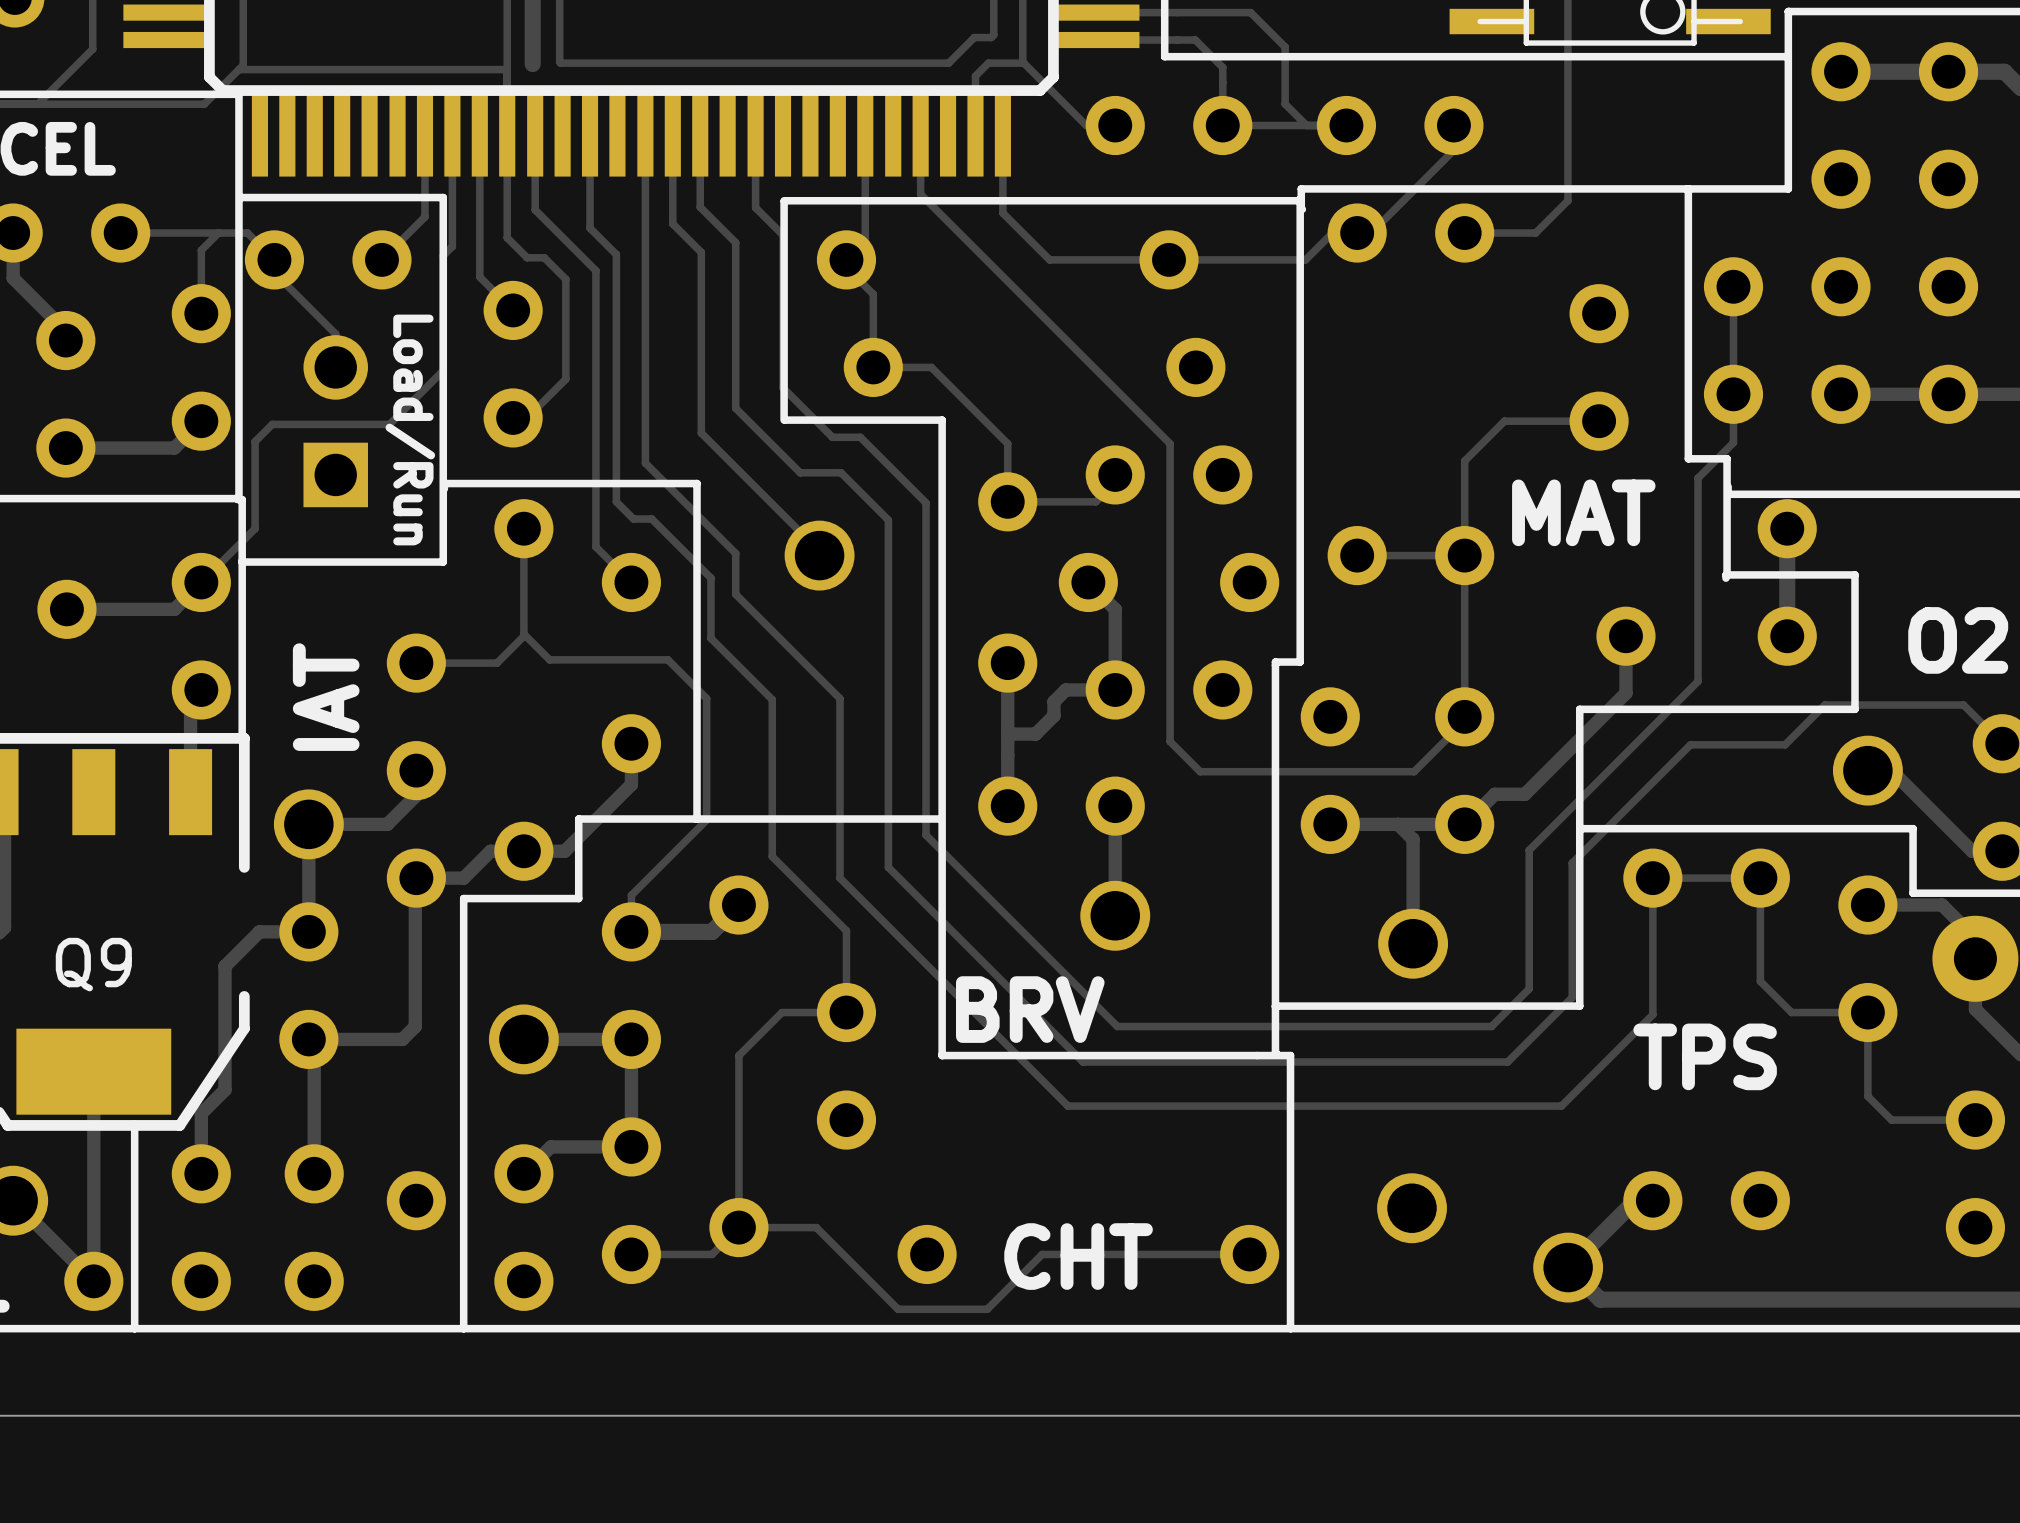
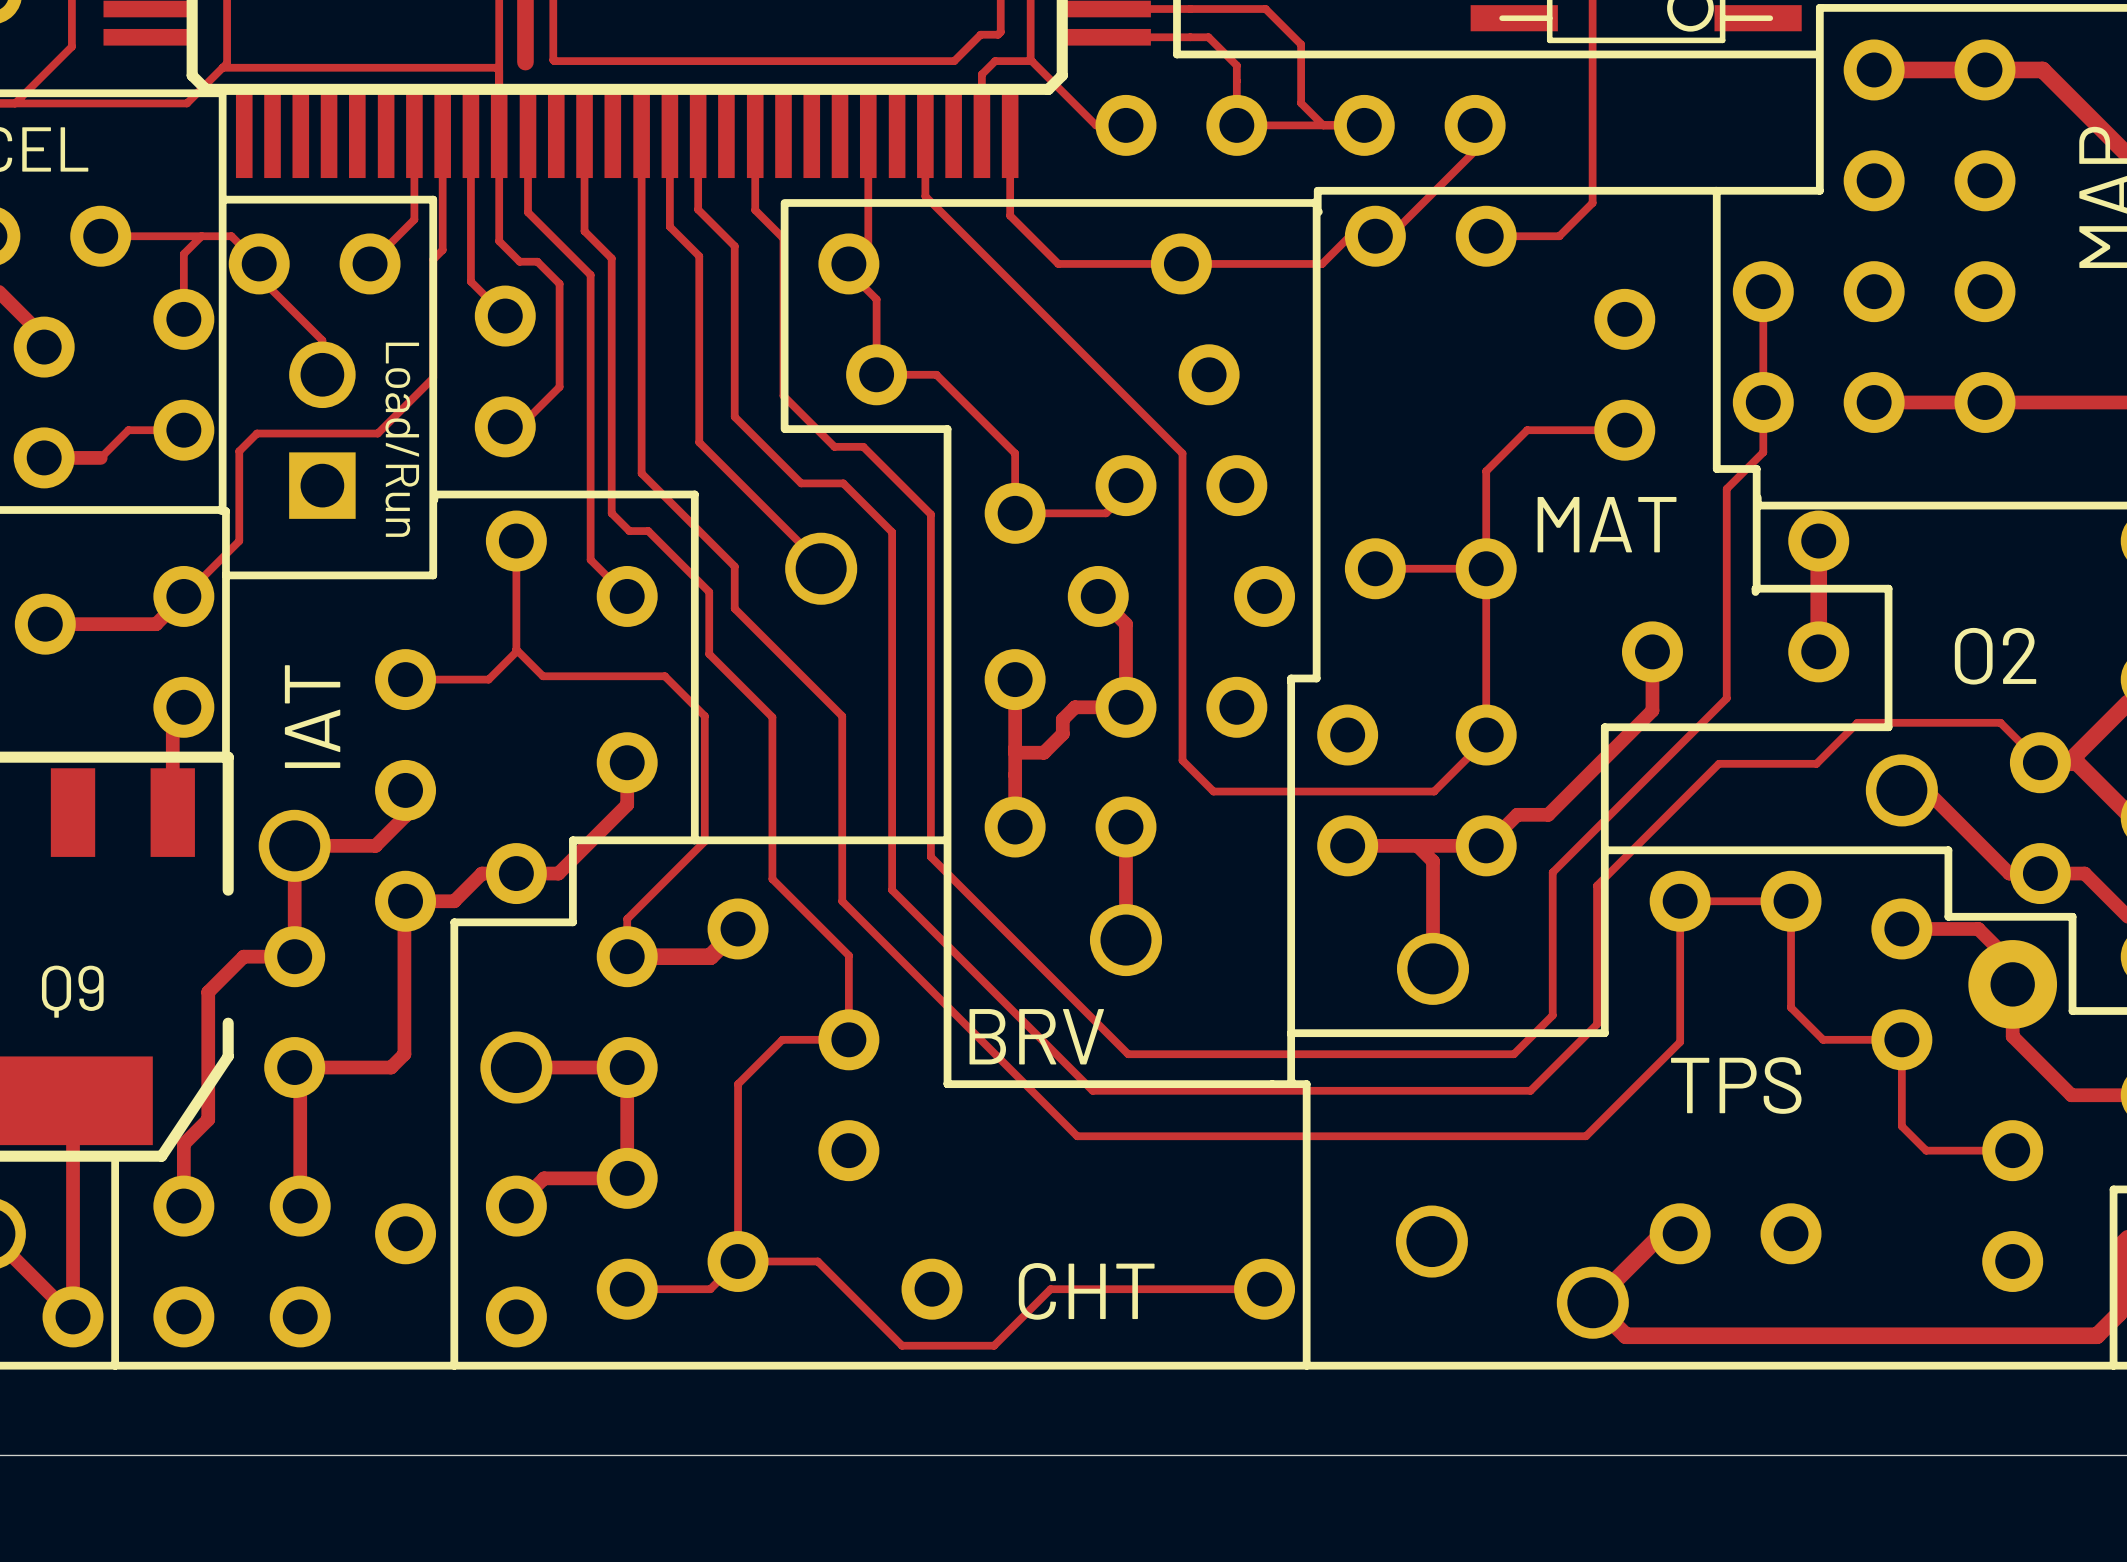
track: (201, 421) (174, 448) (120, 448) -> (183, 430) (128, 430) (100, 457)

